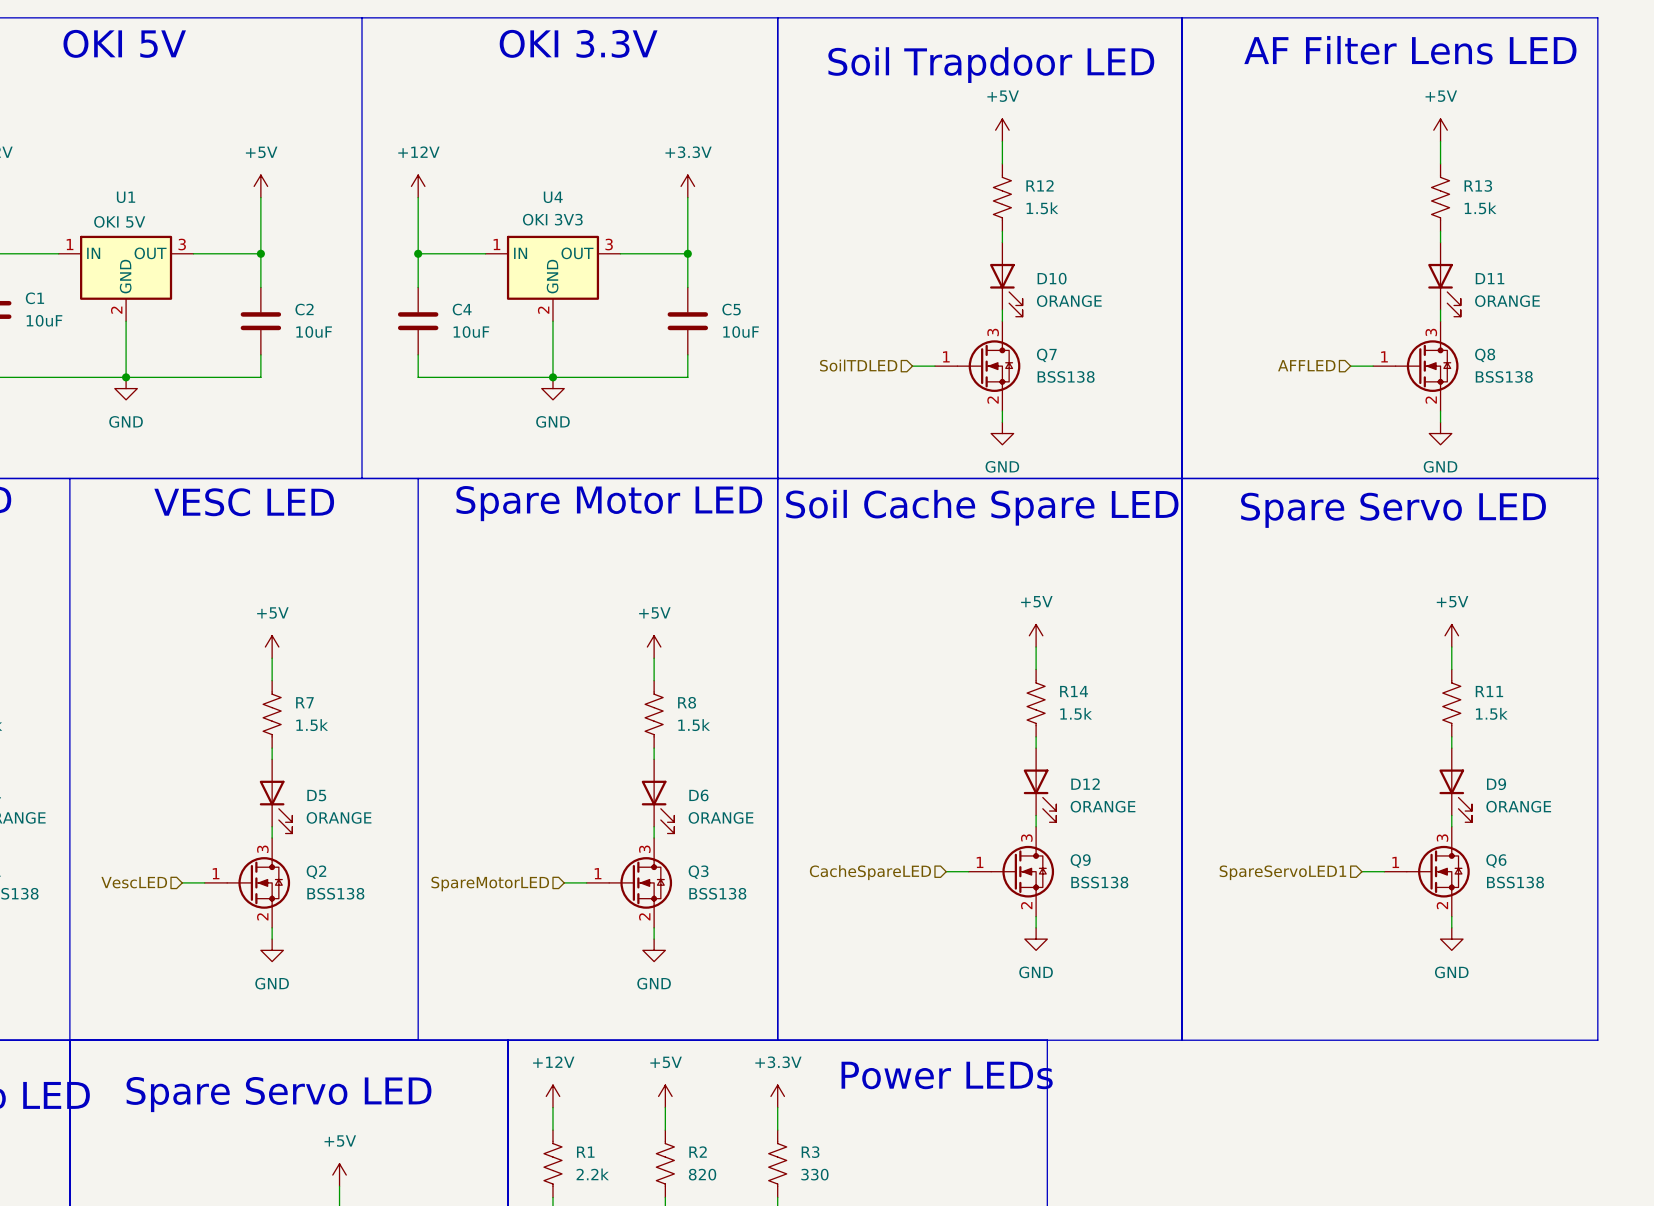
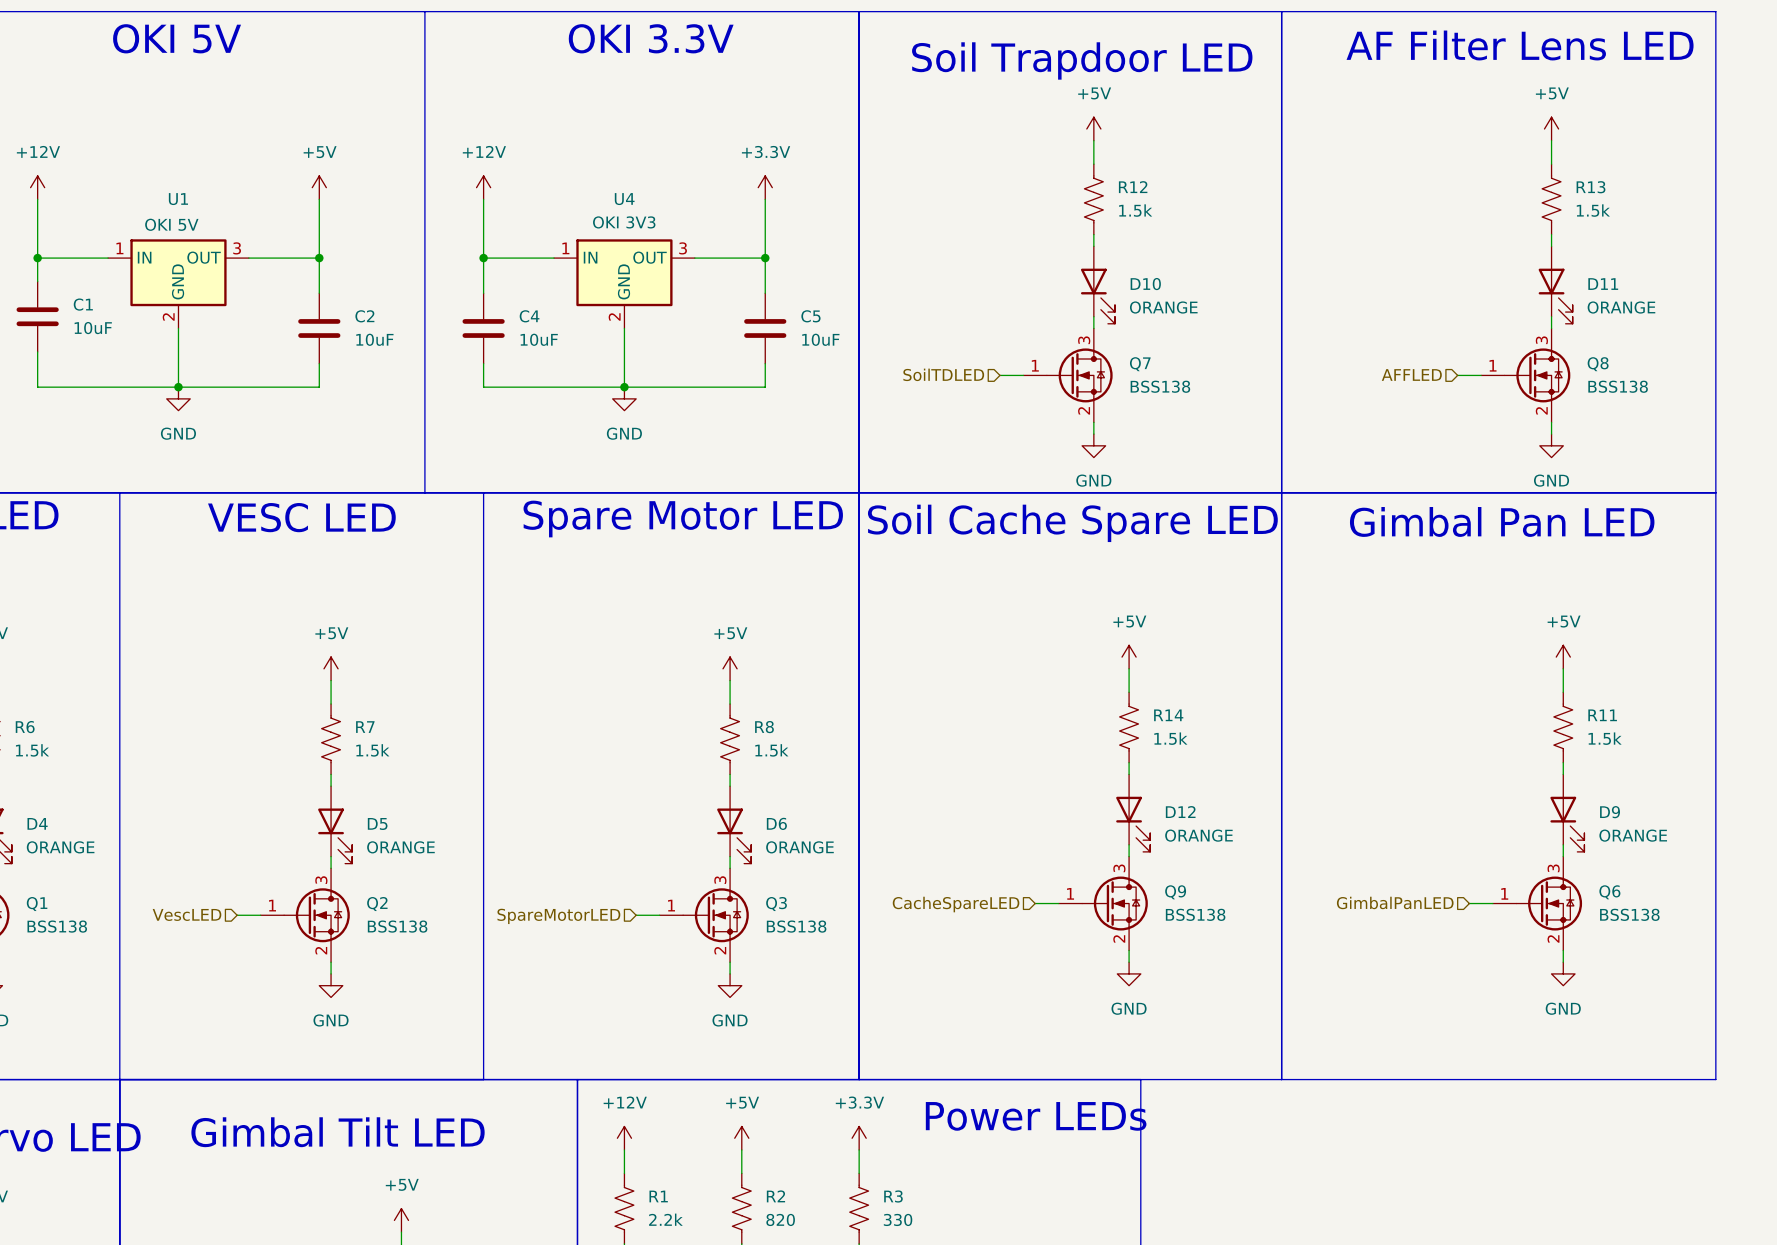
text: Spare Servo LED (1393, 510) -> Gimbal Pan LED (1502, 521)
hierarchical label: SpareServoLED1 (1282, 872) -> GimbalPanLED (1395, 902)
text: Spare Servo LED (278, 1094) -> Gimbal Tilt LED (338, 1132)

